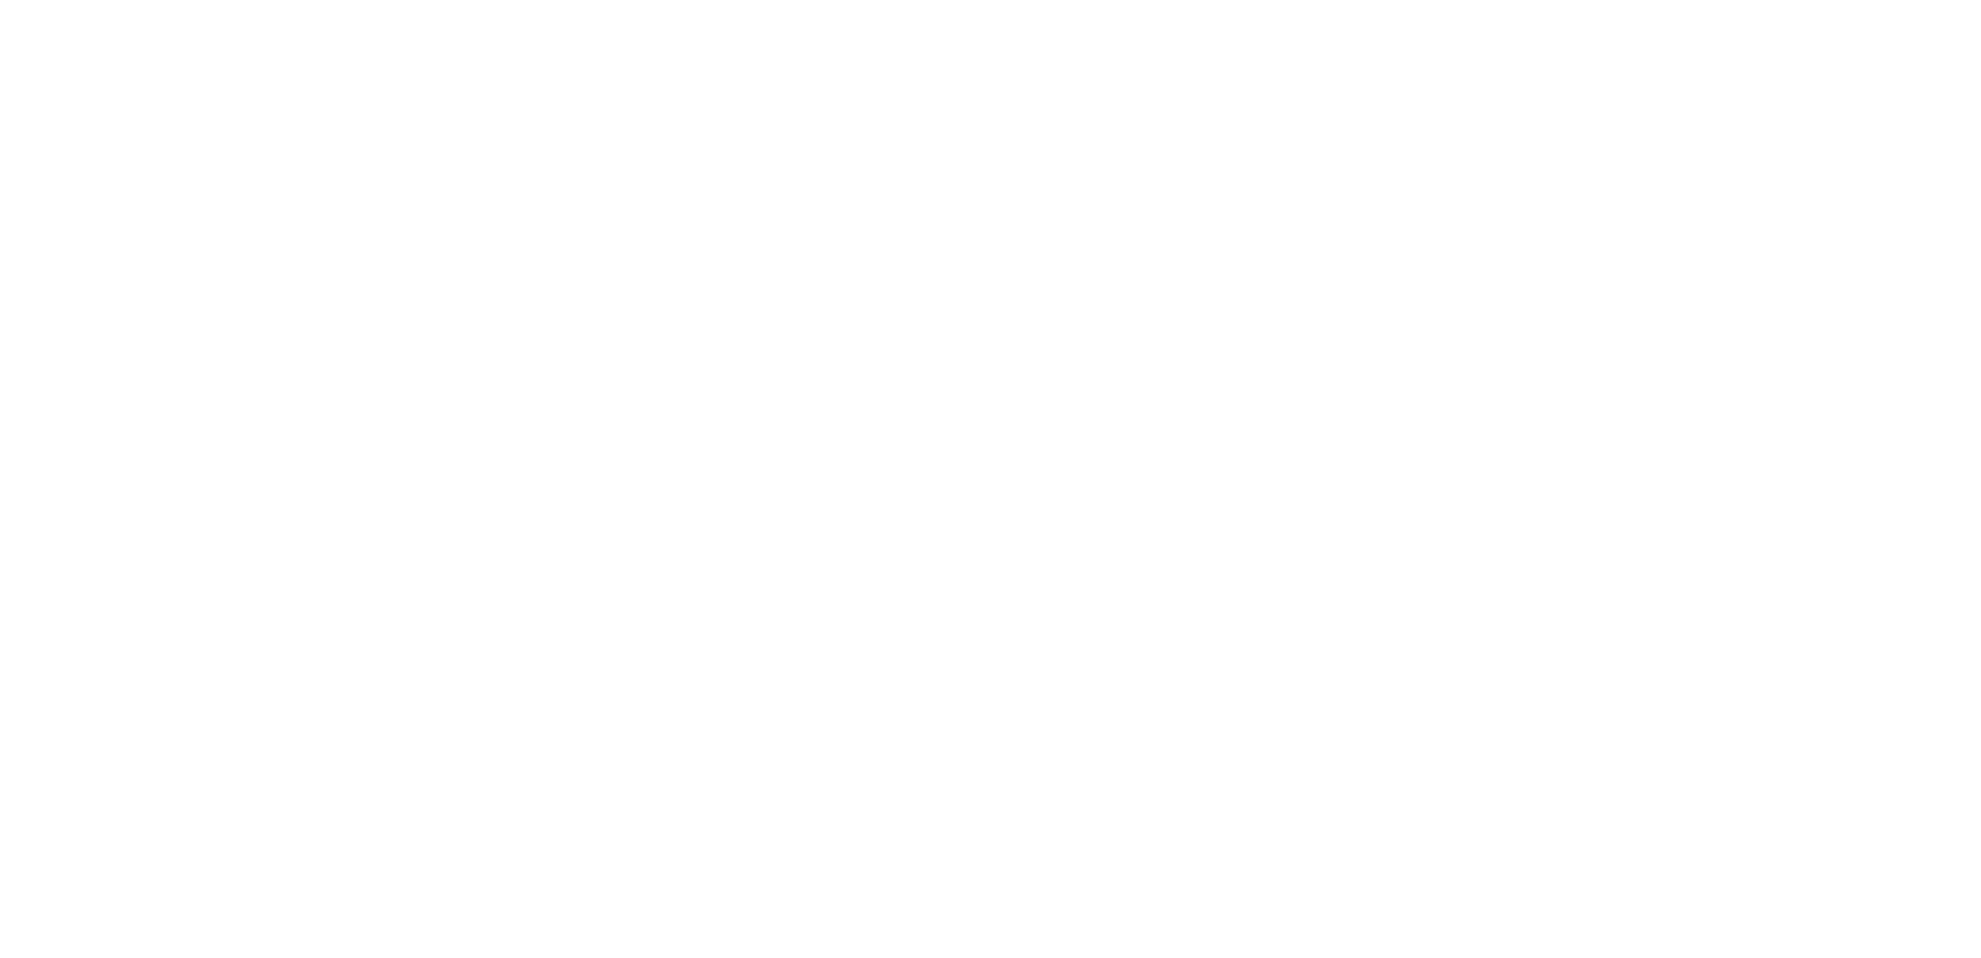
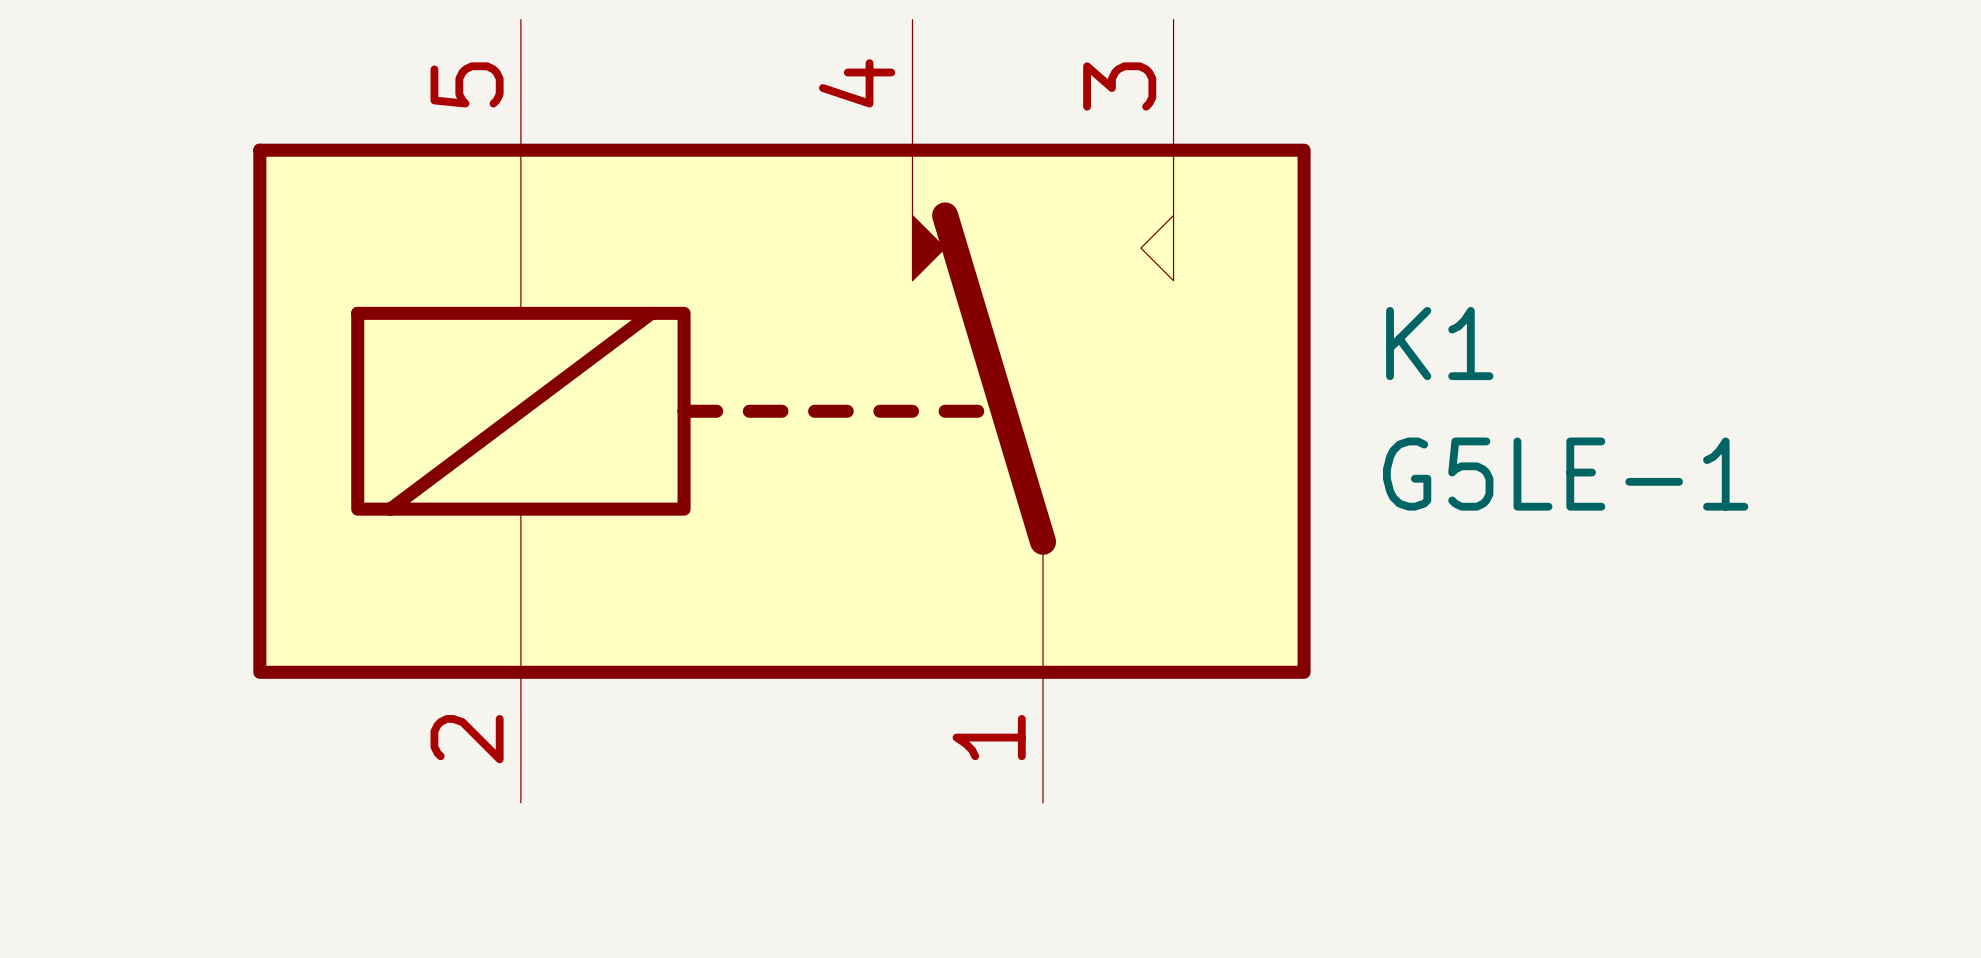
K1: none -> G5LE-1 (781, 411)

